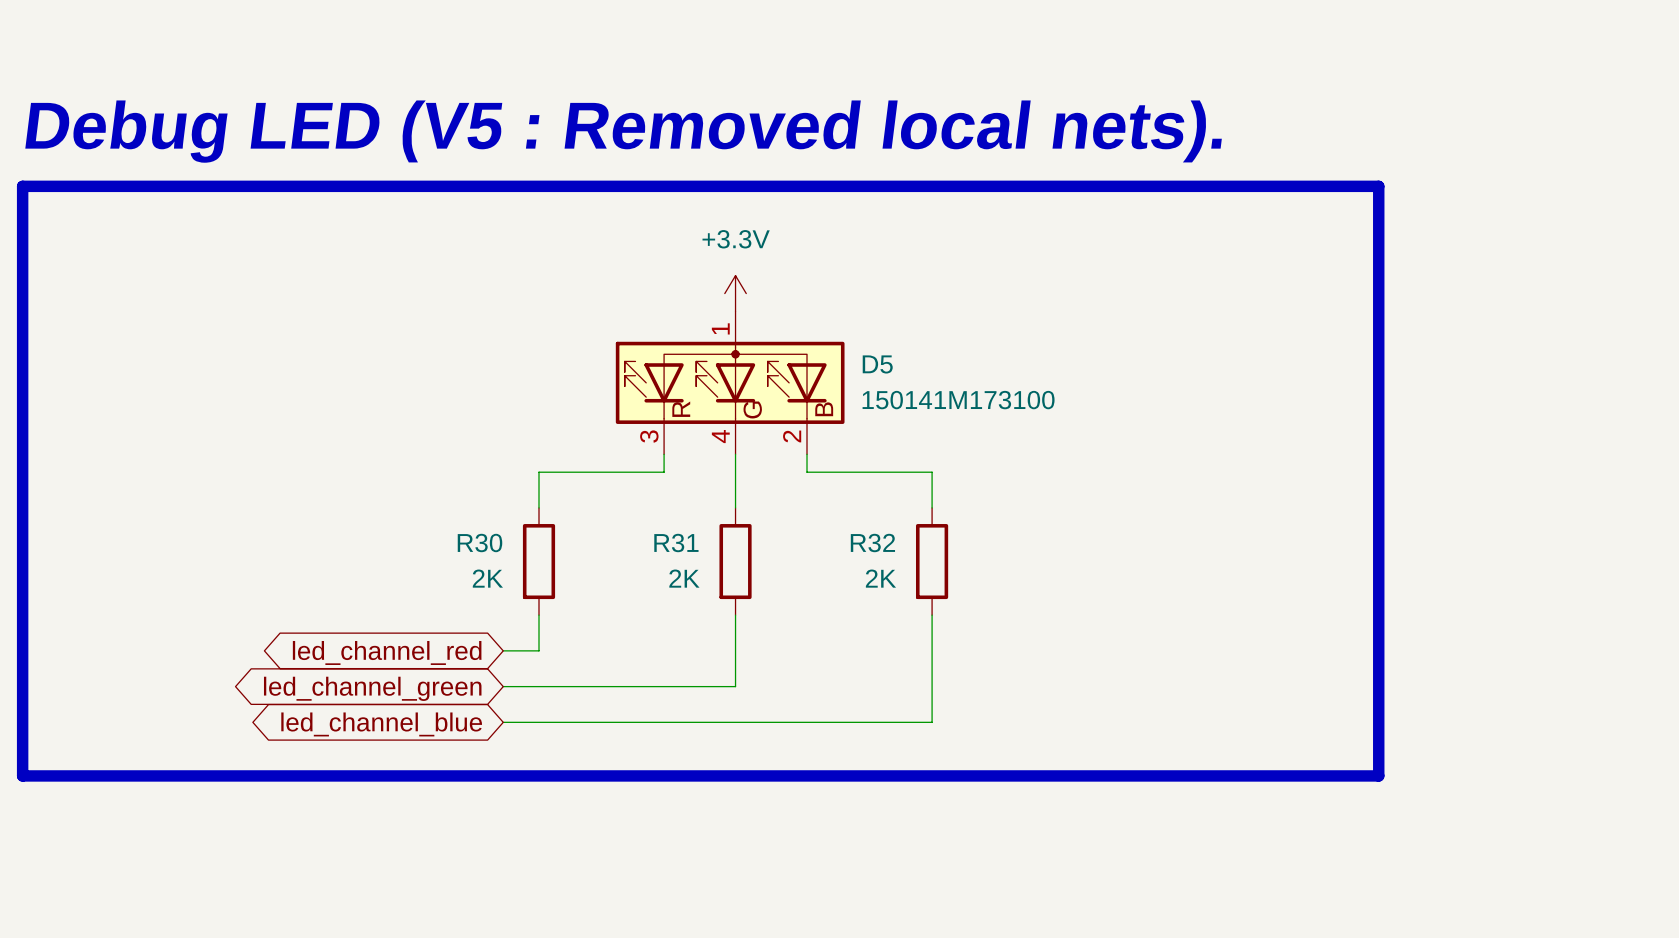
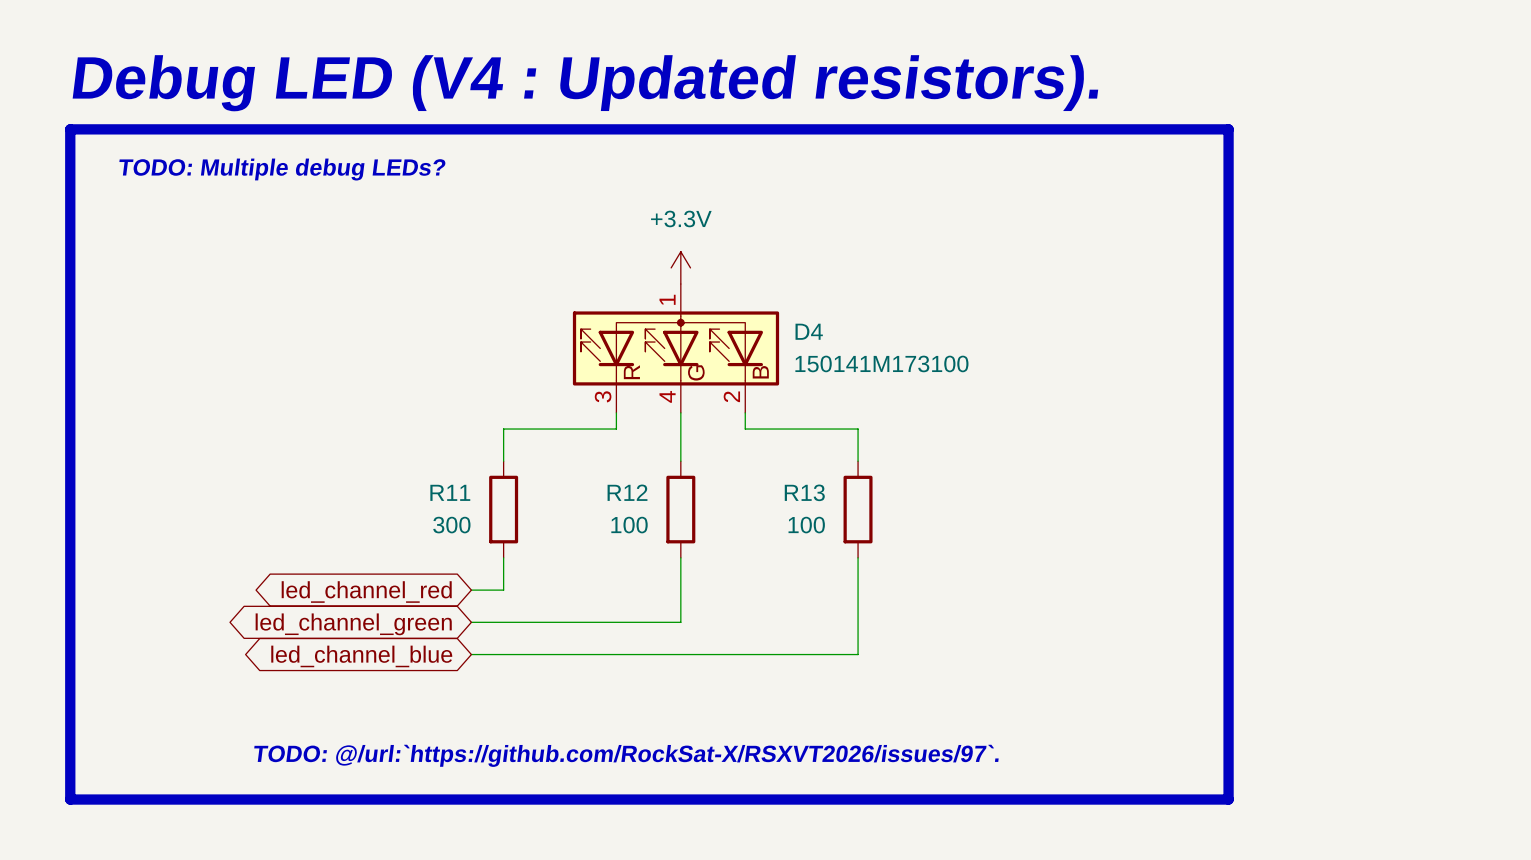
text: Debug LED (V5 : Removed local nets). (623, 131) -> Debug LED (V4 : Updated resistors). (585, 83)
text: none -> TODO: Multiple debug LEDs? (282, 169)
line: (22, 186) (1378, 186) (1378, 775) (22, 775) (22, 186) -> (70, 129) (70, 799) (1228, 799) (1228, 129) (70, 129)
D5 name: D5 (877, 364) -> D4 (809, 331)
R30 name: R30 (480, 543) -> R11 (450, 492)
R31 name: R31 (676, 543) -> R12 (627, 492)
R32 name: R32 (872, 543) -> R13 (804, 492)
R30 value: 2K (487, 578) -> 300 (451, 525)
R31 value: 2K (684, 578) -> 100 (629, 525)
R32 value: 2K (880, 578) -> 100 (806, 525)
text: none -> TODO: @/url:`https://github.com/RockSat-X/RSXVT2026/issues/97`. (626, 755)

